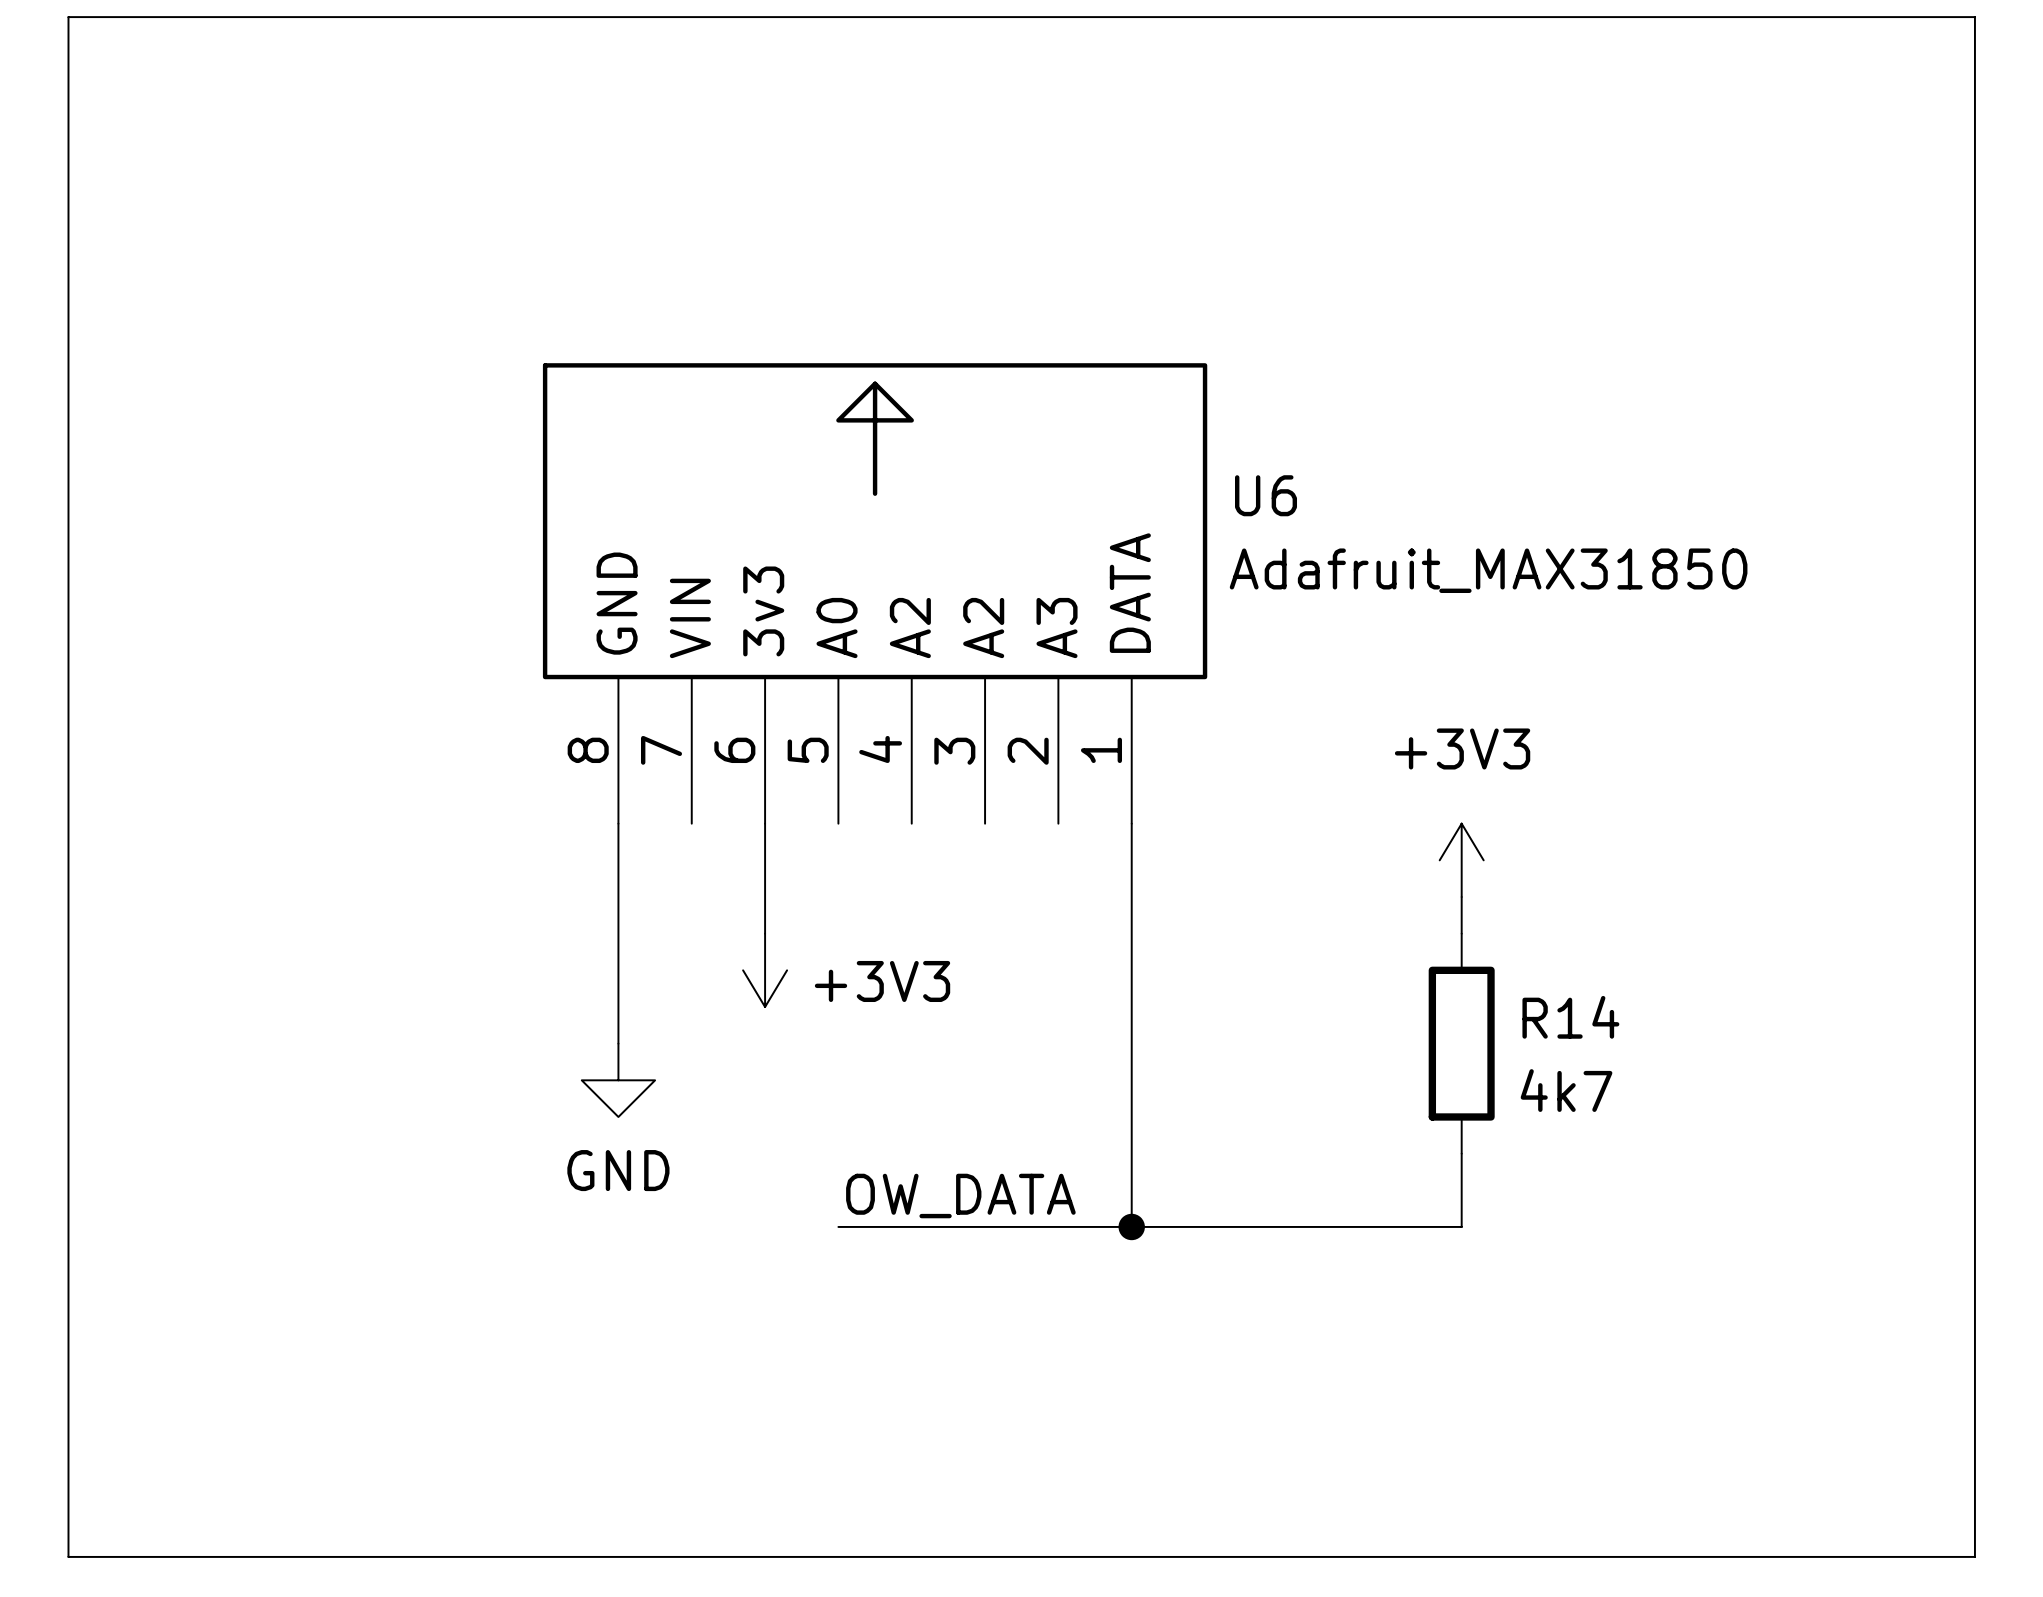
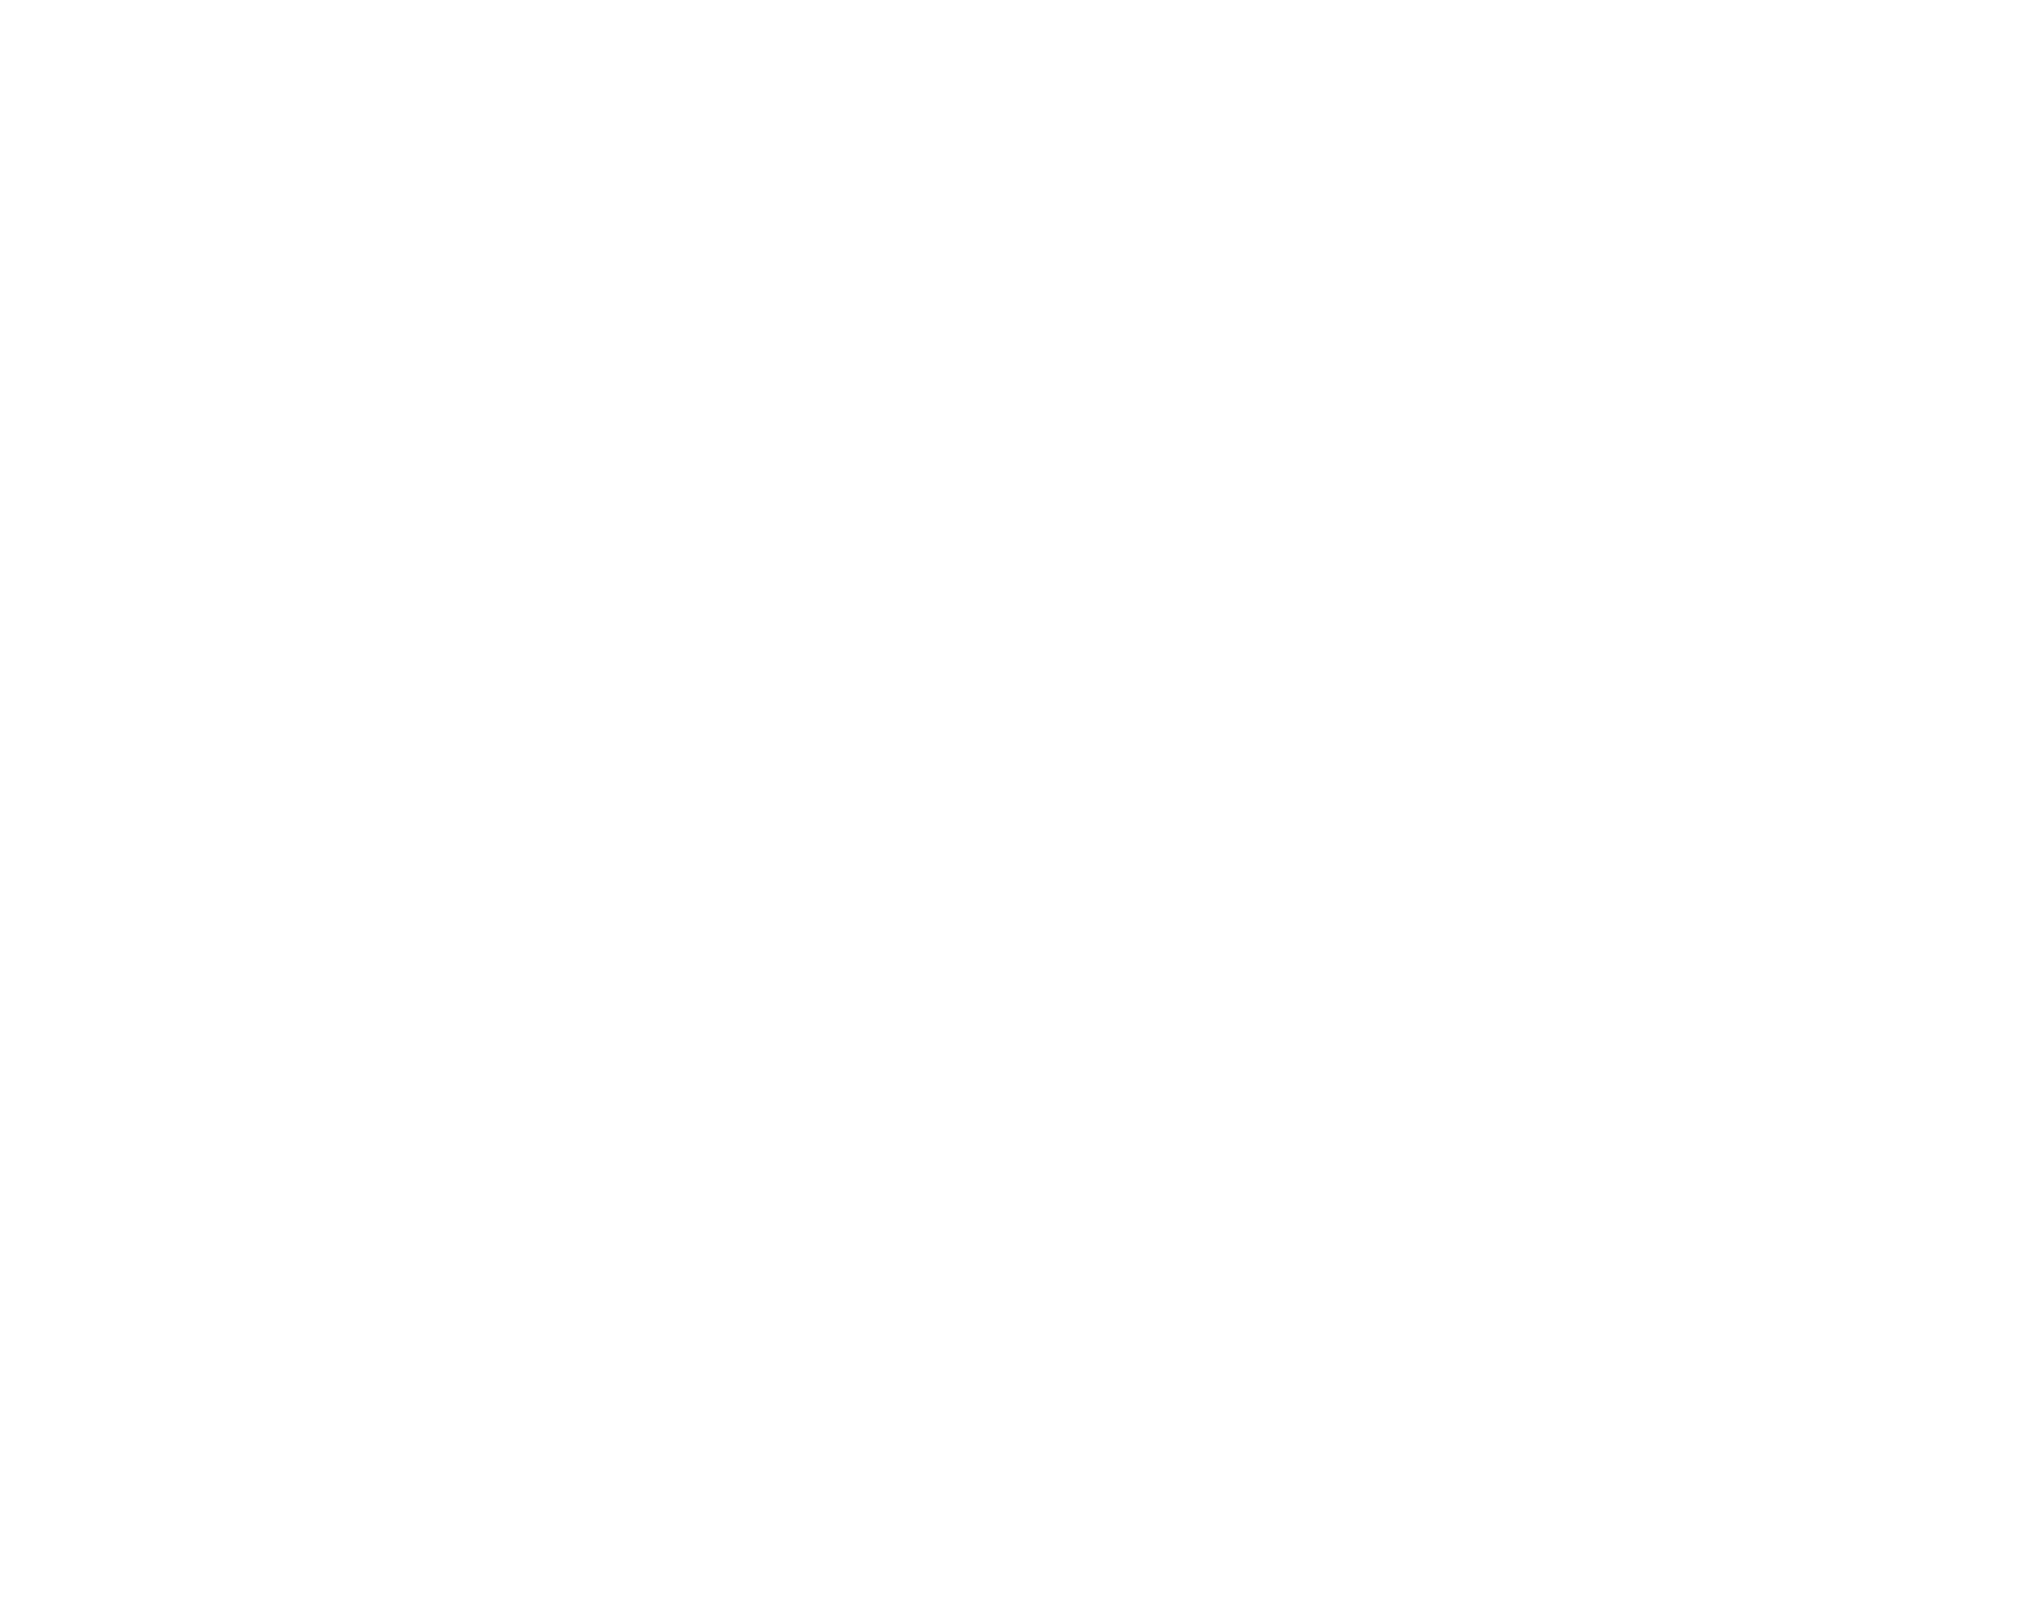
line: (68, 17) (68, 1556) (1974, 1556) (1974, 17) (68, 17) -> none
U6: Adafruit_MAX31850 (875, 593) -> none
wire: (618, 823) (618, 1043) -> none
wire: (765, 823) (765, 933) -> none
wire: (1131, 823) (1131, 1226) -> none
power symbol: +3V3 (1461, 860) -> none
wire: (1461, 897) (1461, 933) -> none
power symbol: +3V3 (765, 970) -> none
R14: 4k7 (1461, 1043) -> none
power symbol: GND (618, 1080) -> none
wire: (1461, 1153) (1461, 1226) (838, 1226) -> none
label: OW_DATA (960, 1196) -> none
junction: (1131, 1226) -> none

